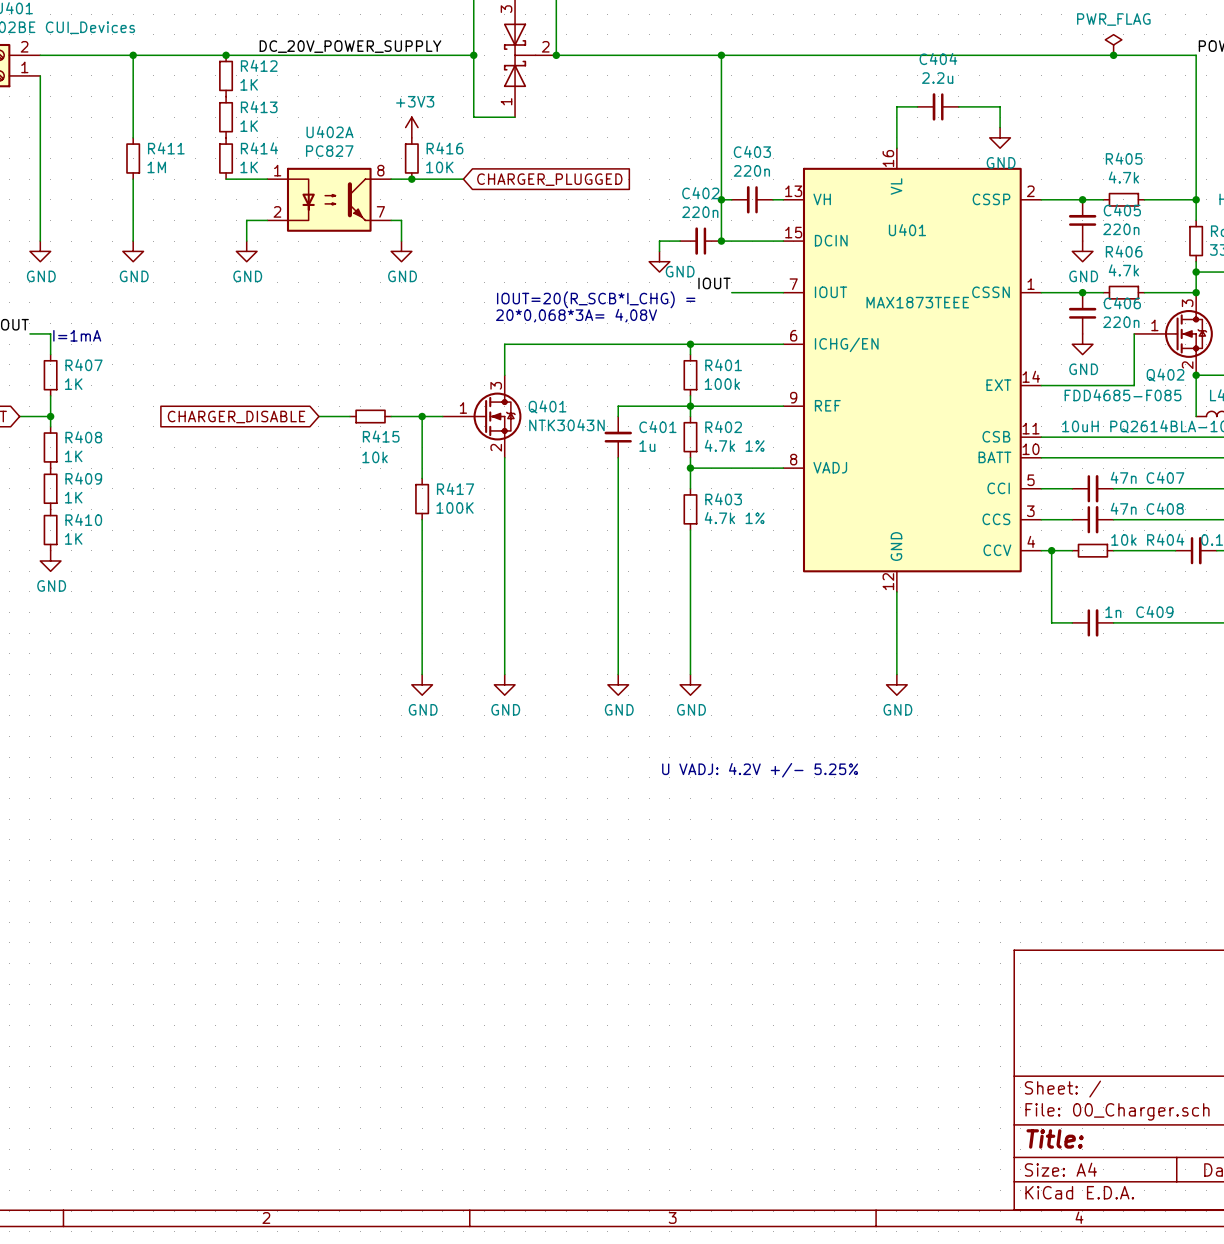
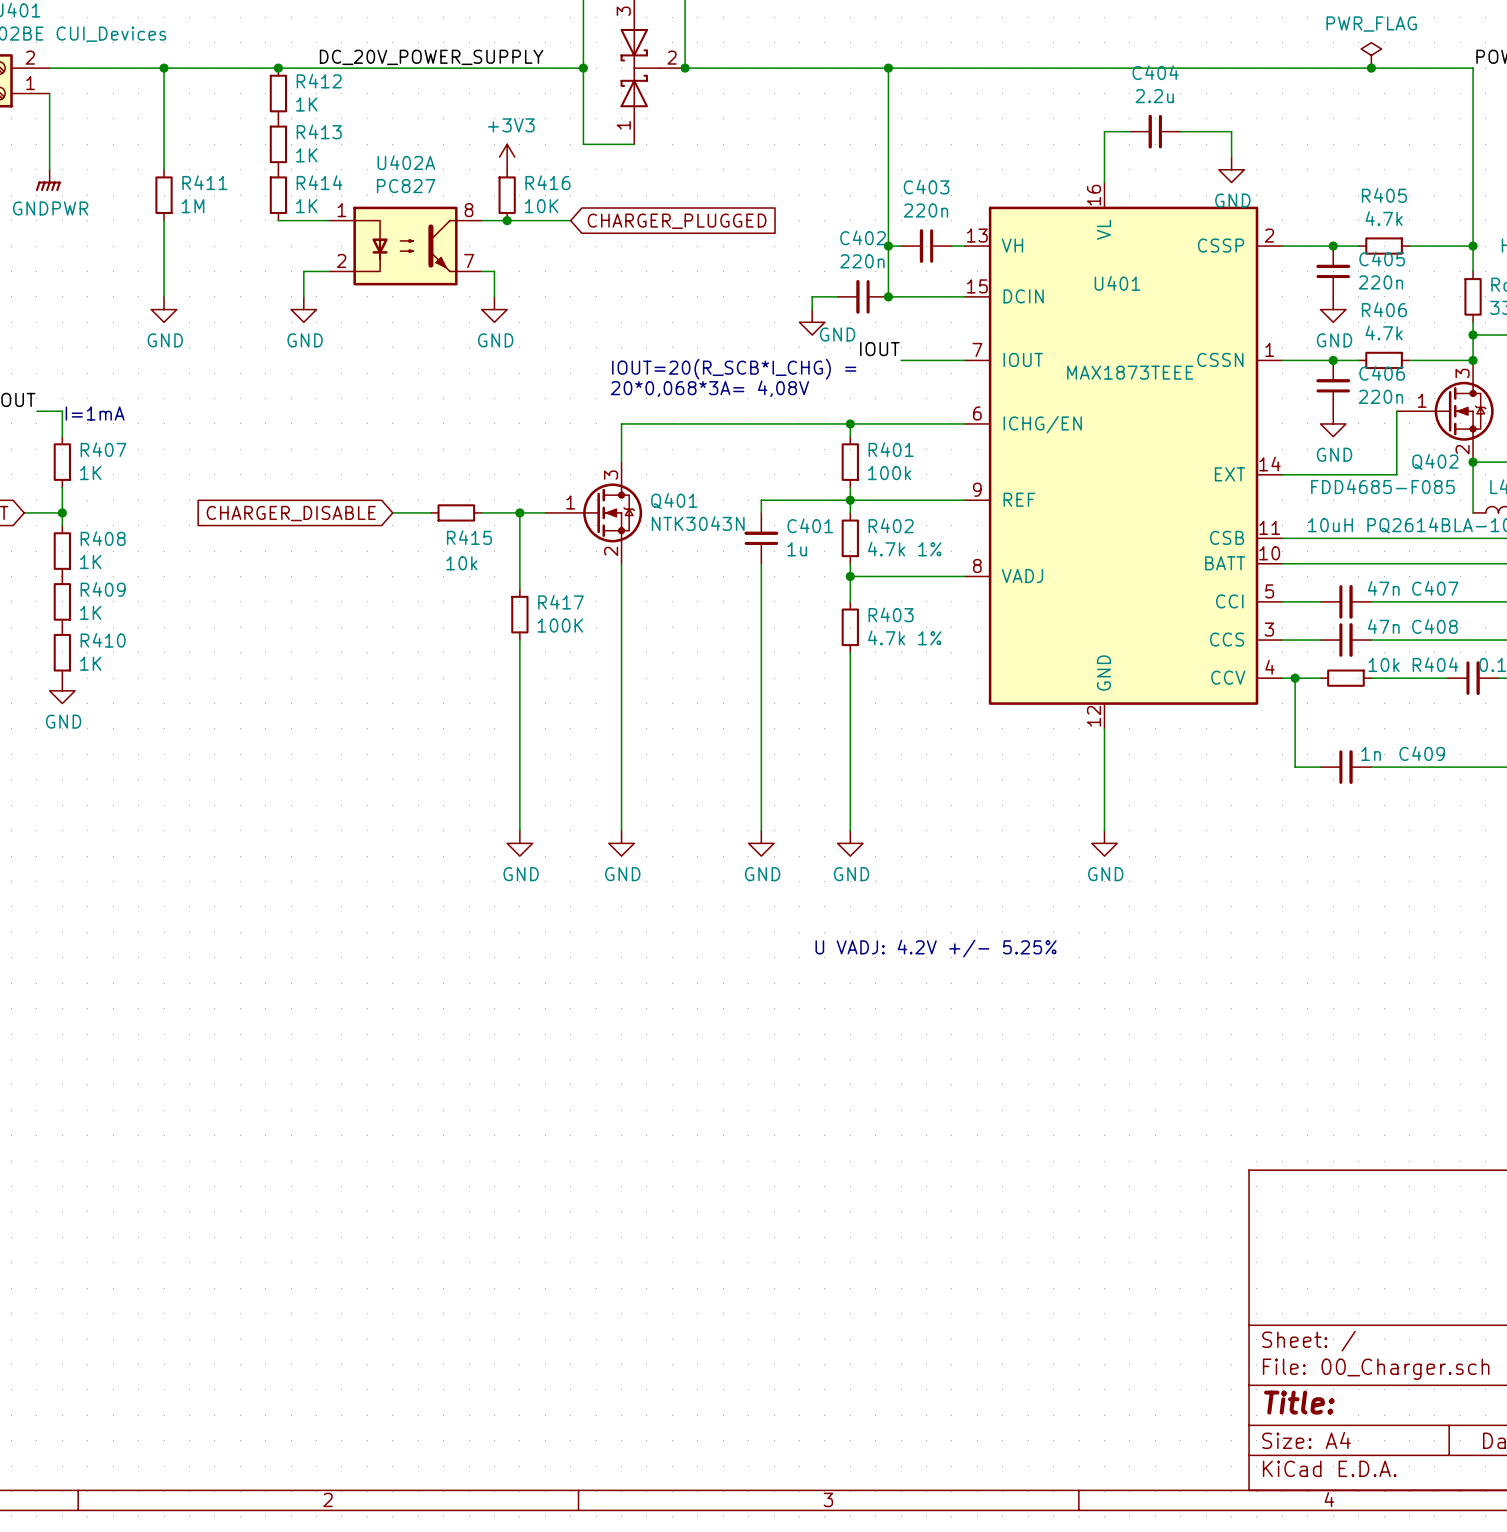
wire: (40, 137) (40, 241) -> none
power symbol: none -> GNDPWR (48, 180)
power symbol: GND (40, 251) -> none

